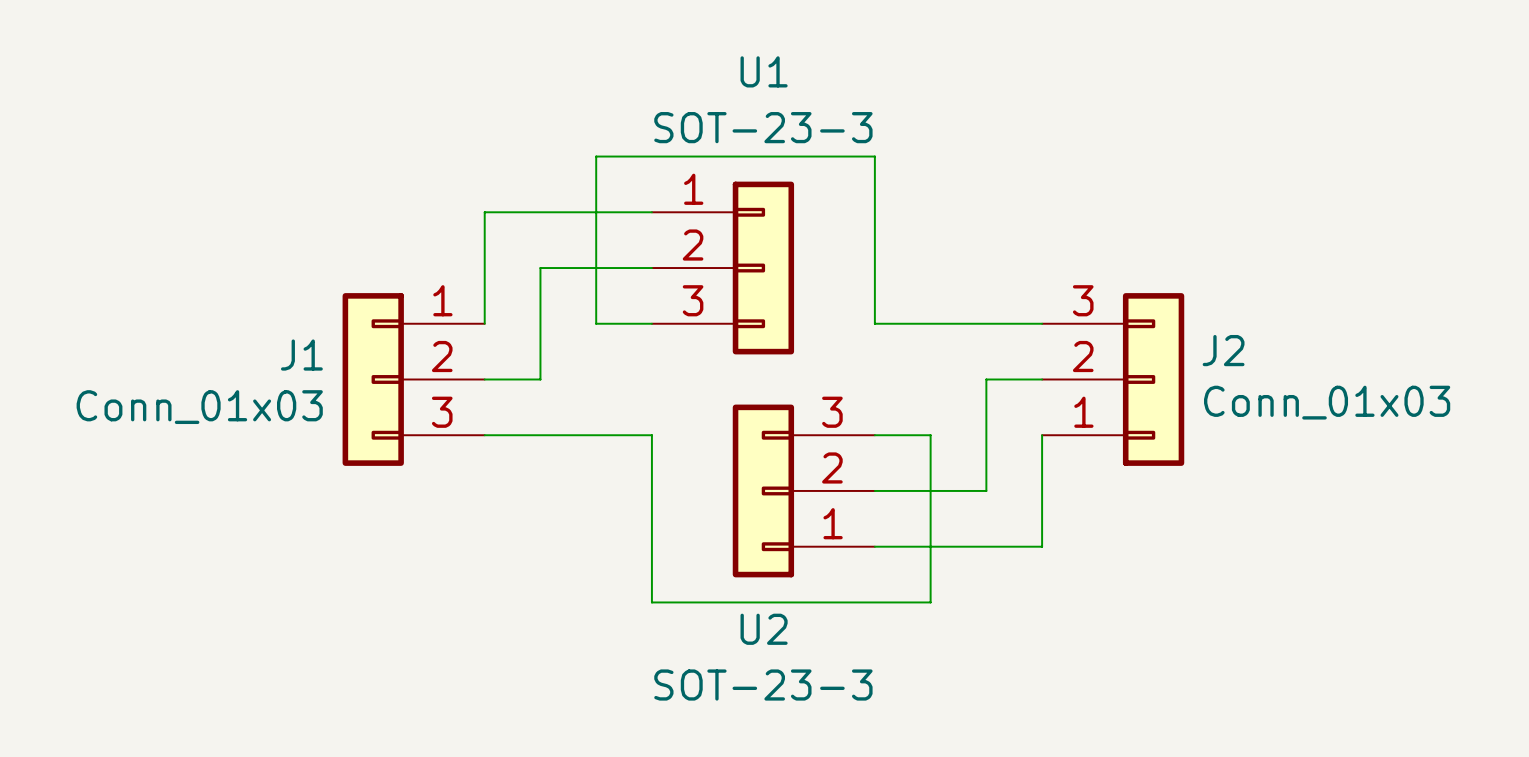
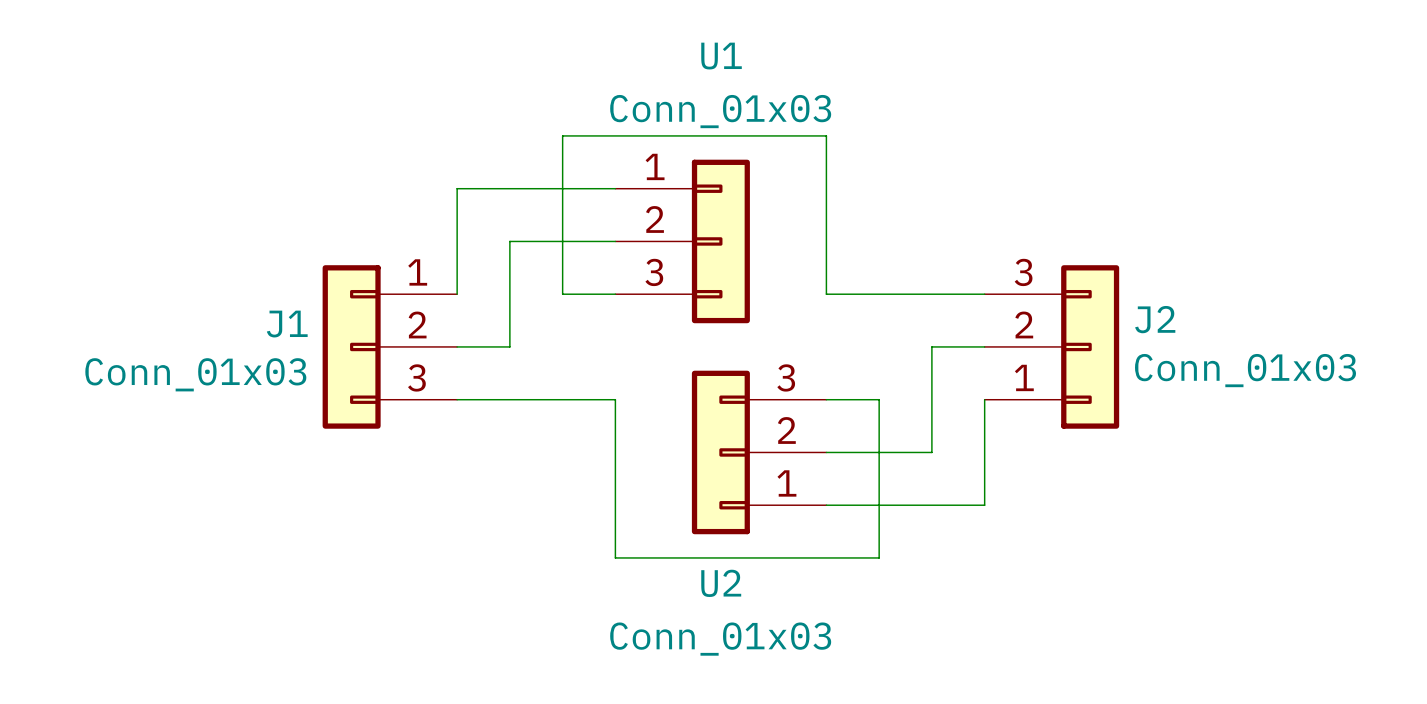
U1 value: SOT-23-3 (763, 127) -> Conn_01x03 (720, 111)
U2 value: SOT-23-3 (763, 685) -> Conn_01x03 (720, 639)

